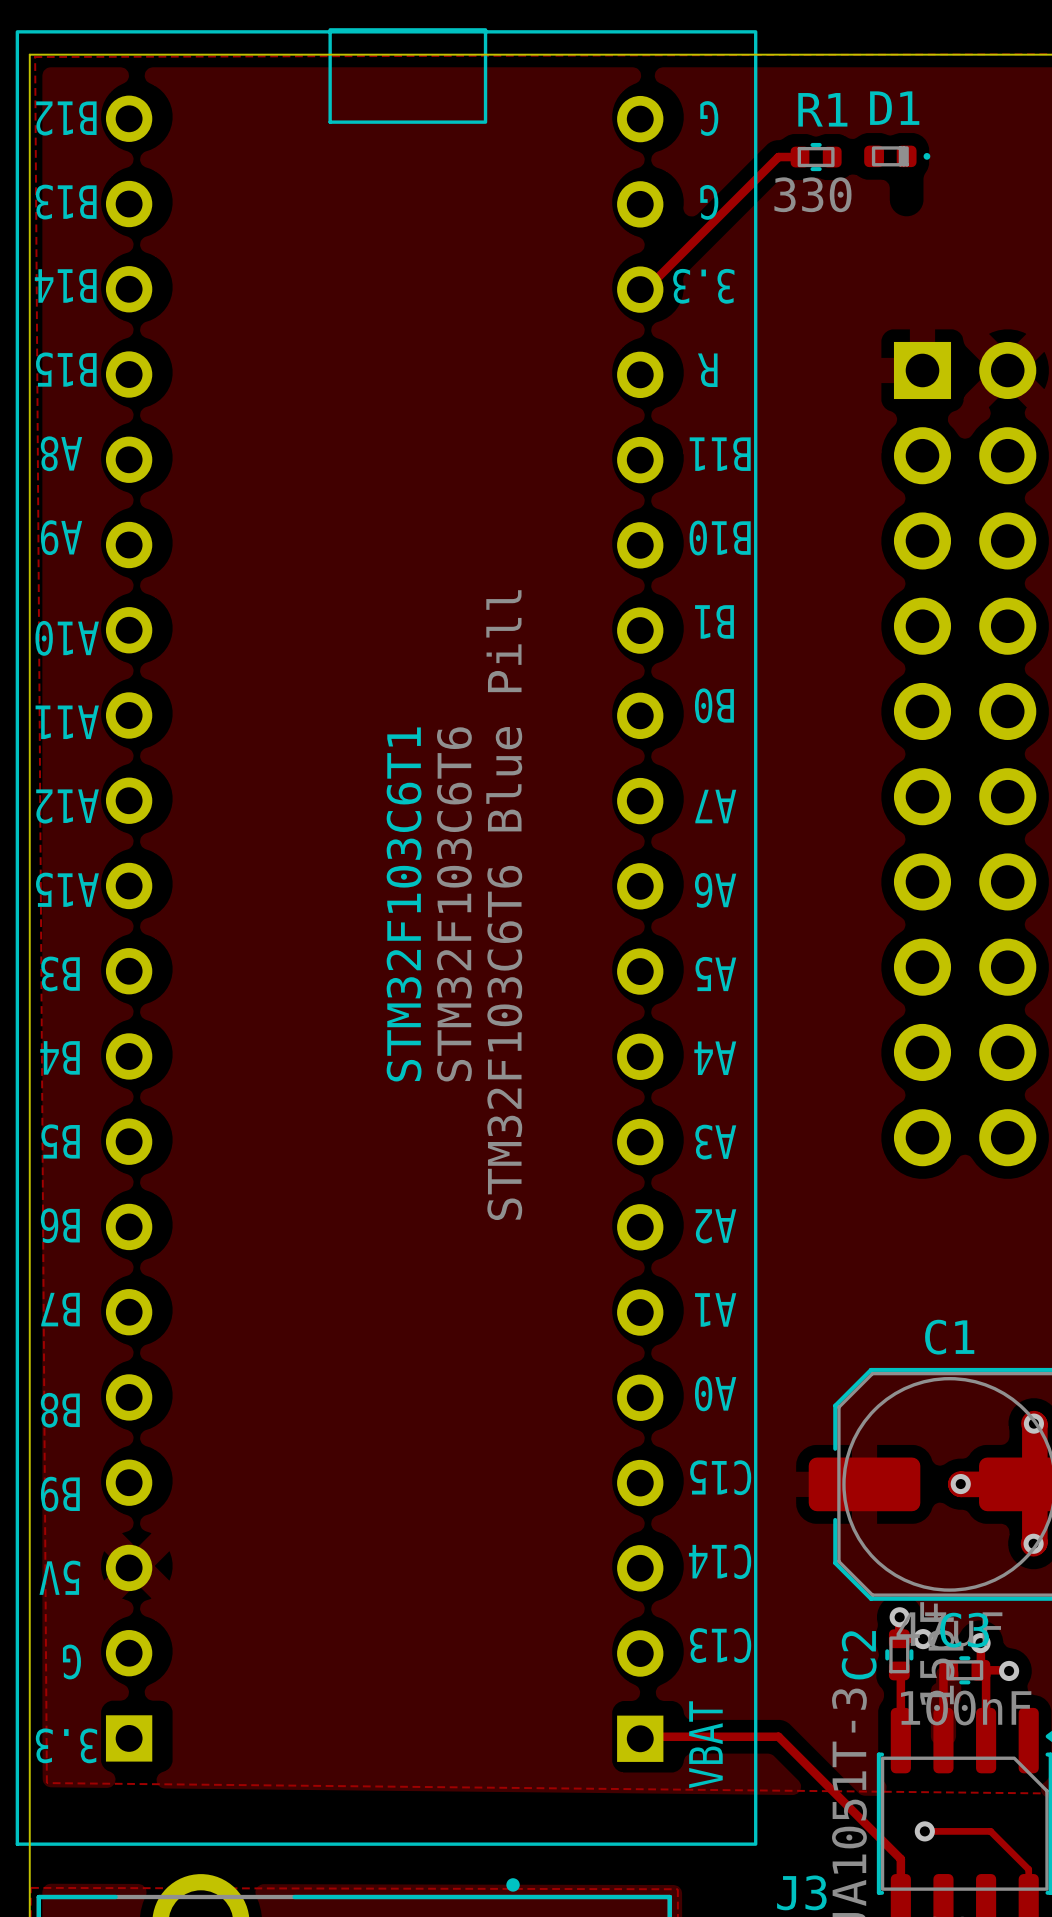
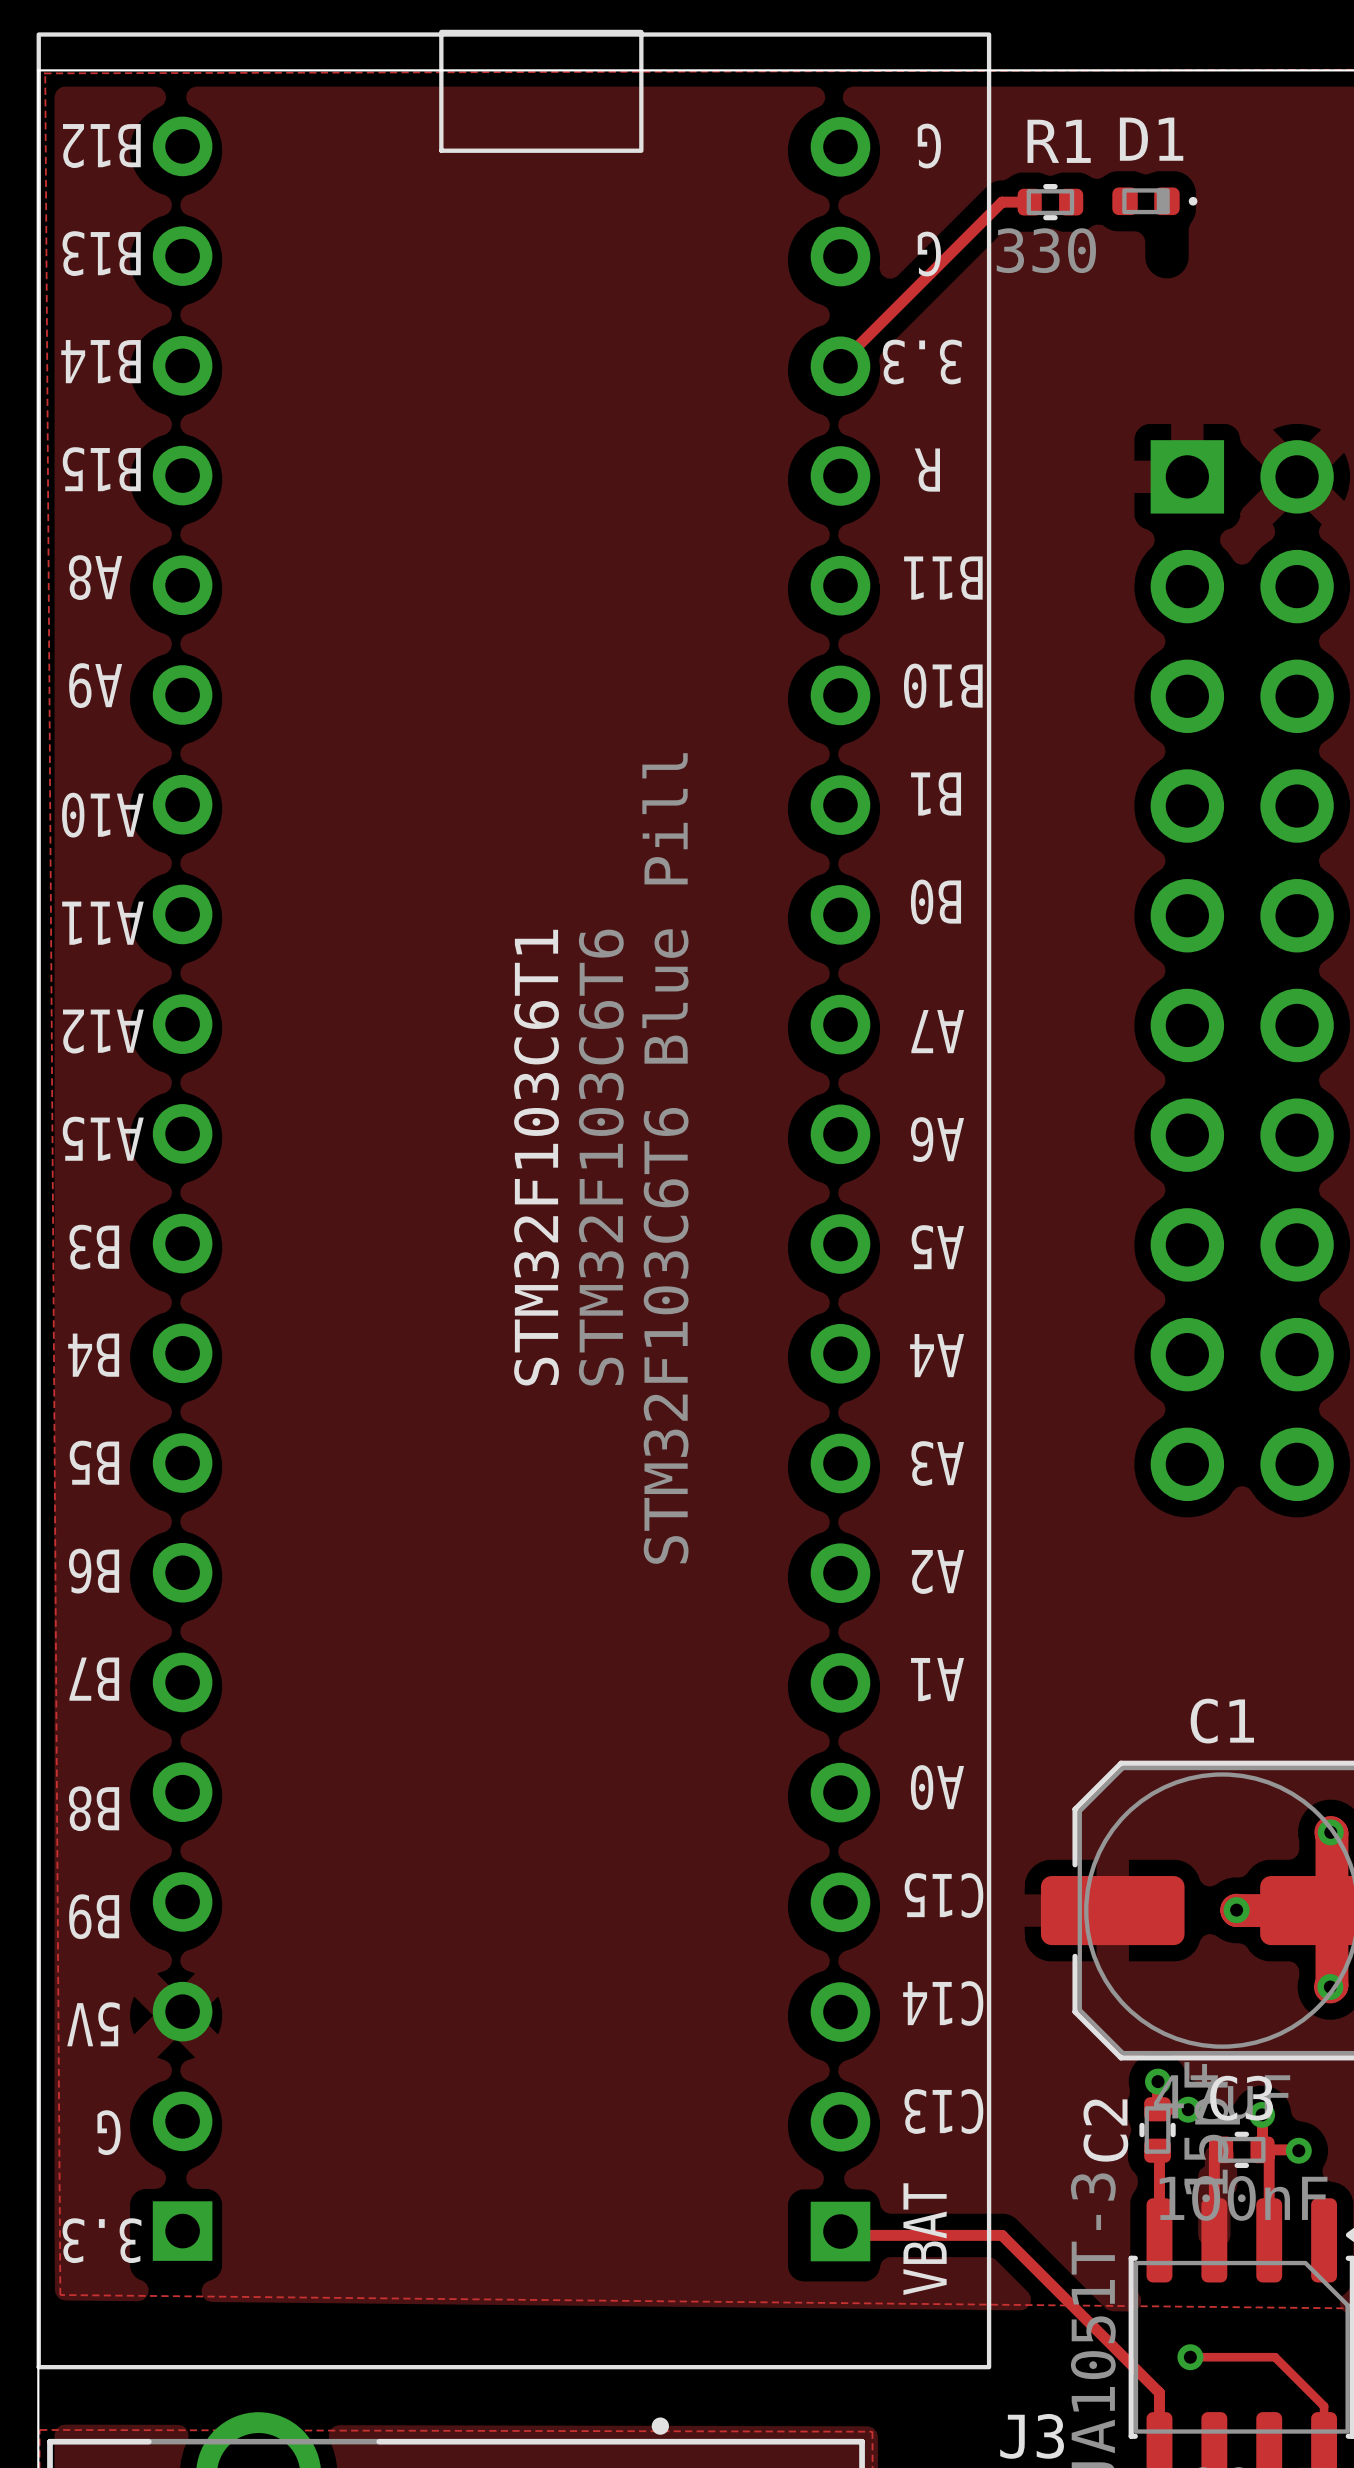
STM32F103C6T1 position: (386, 936) -> (513, 1199)

